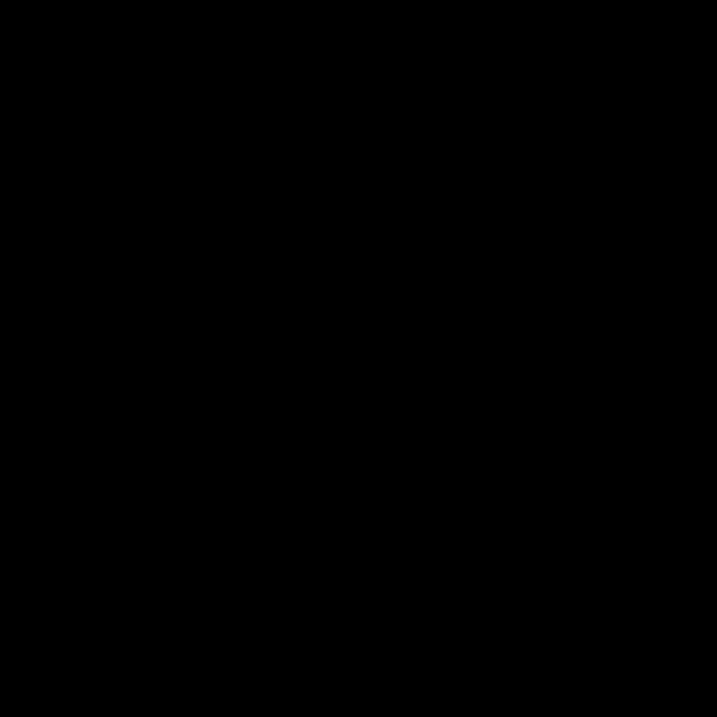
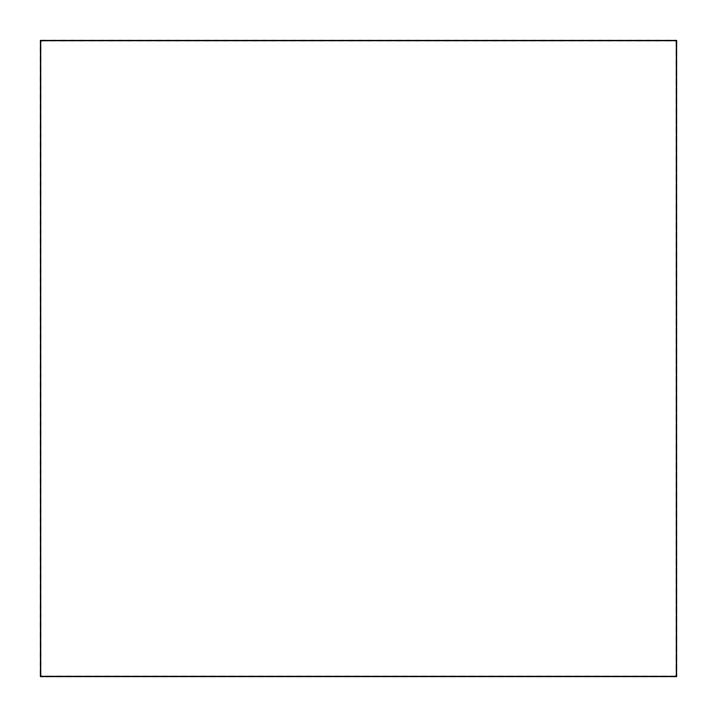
board edge: none -> (40, 40) (40, 676) (676, 676) (676, 40) (40, 40)

